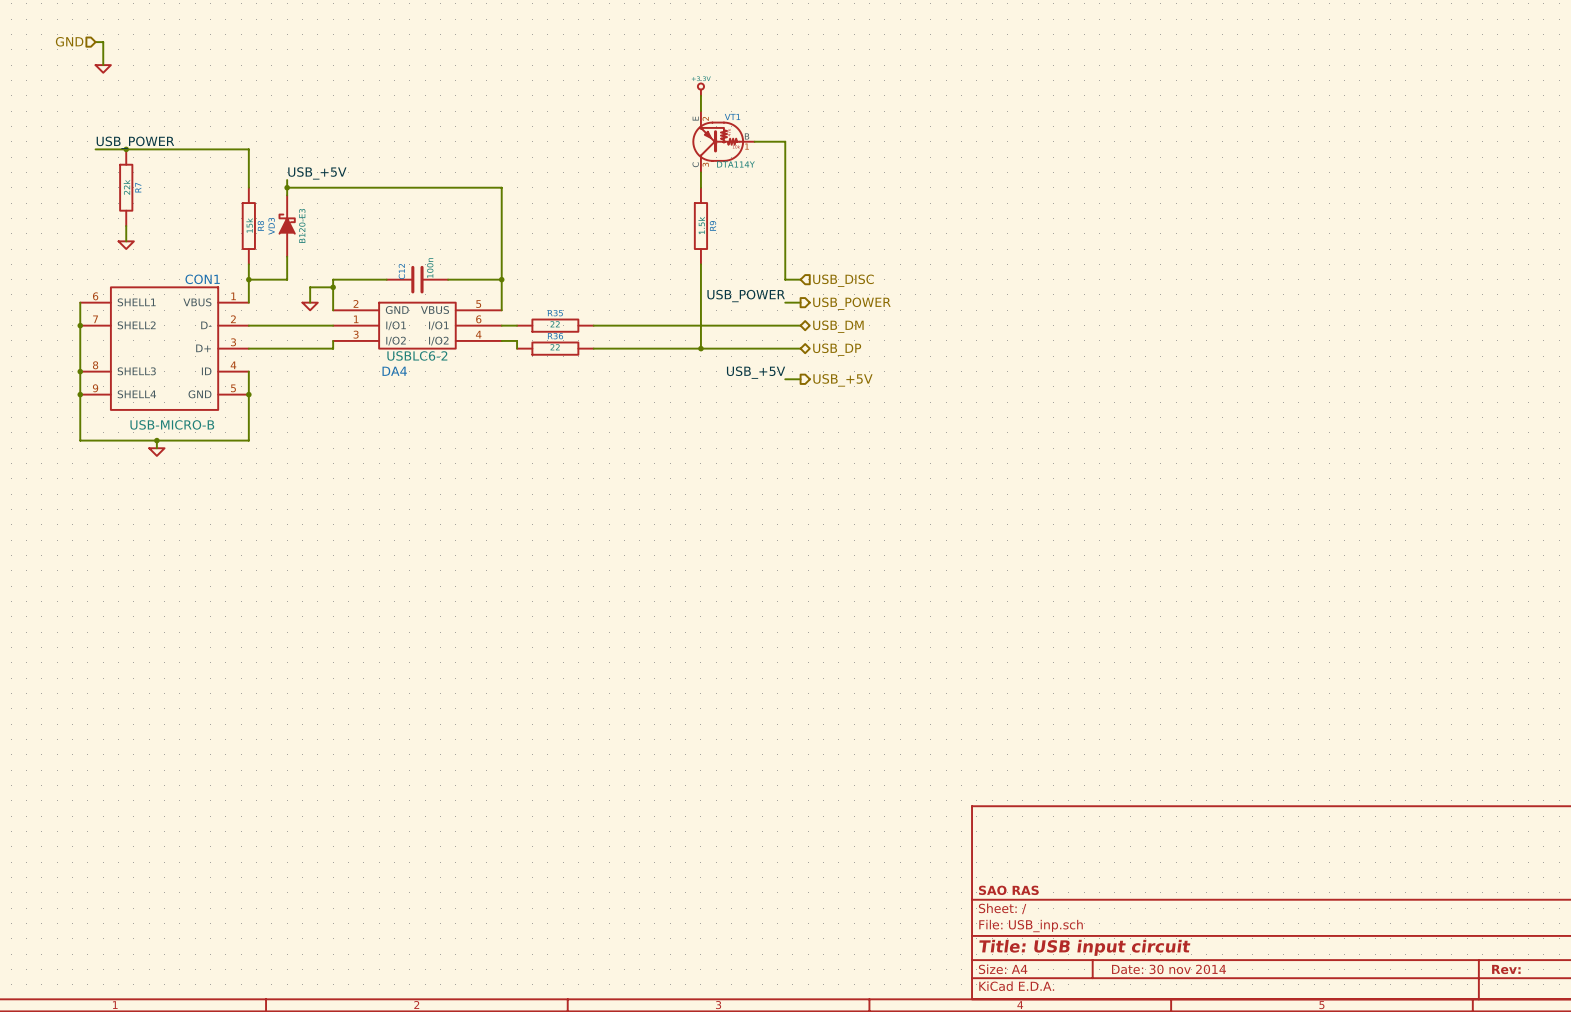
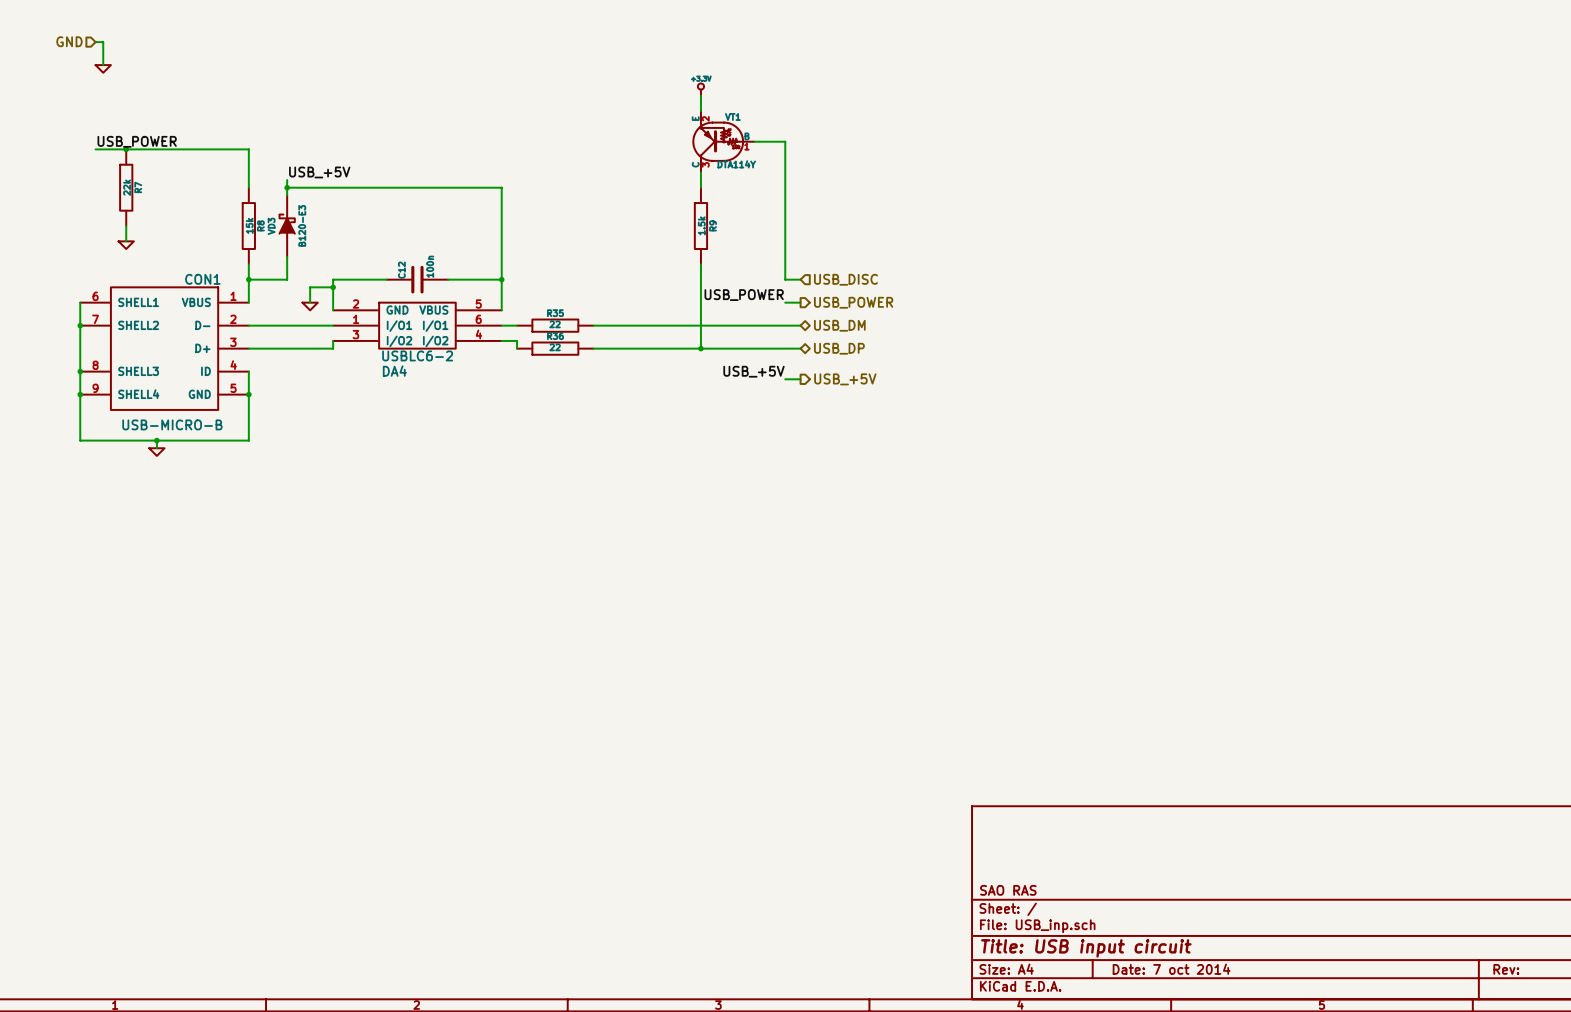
title block: Date: 30 nov 2014 (1169, 969) -> Date: 7 oct 2014 (1171, 969)

